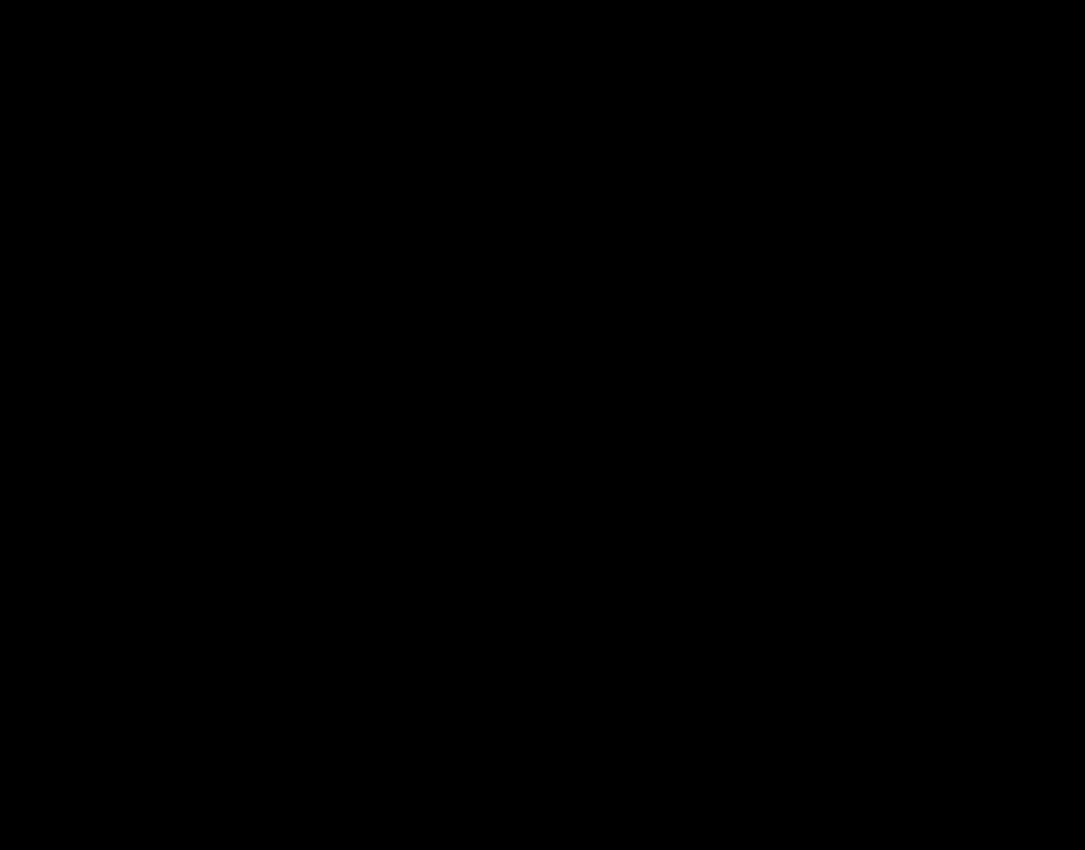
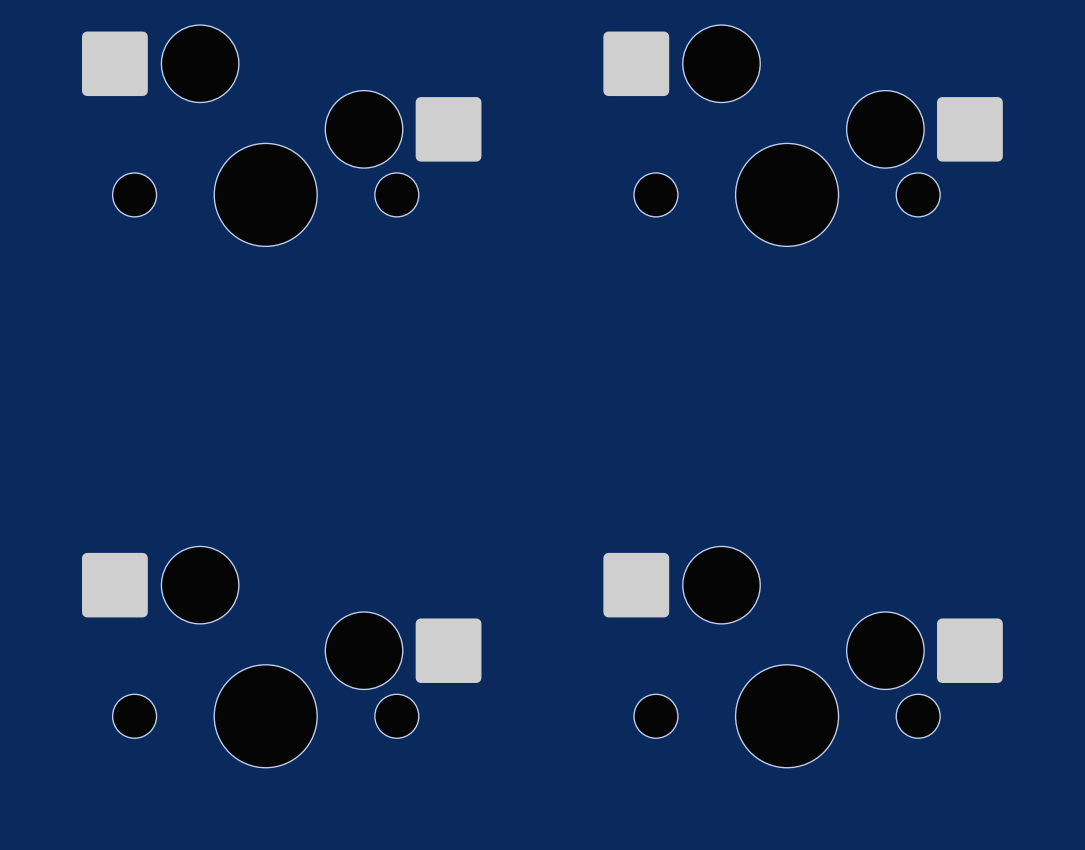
part: none -> (281, 135)
part: none -> (803, 135)
part: none -> (281, 657)
part: none -> (803, 657)

